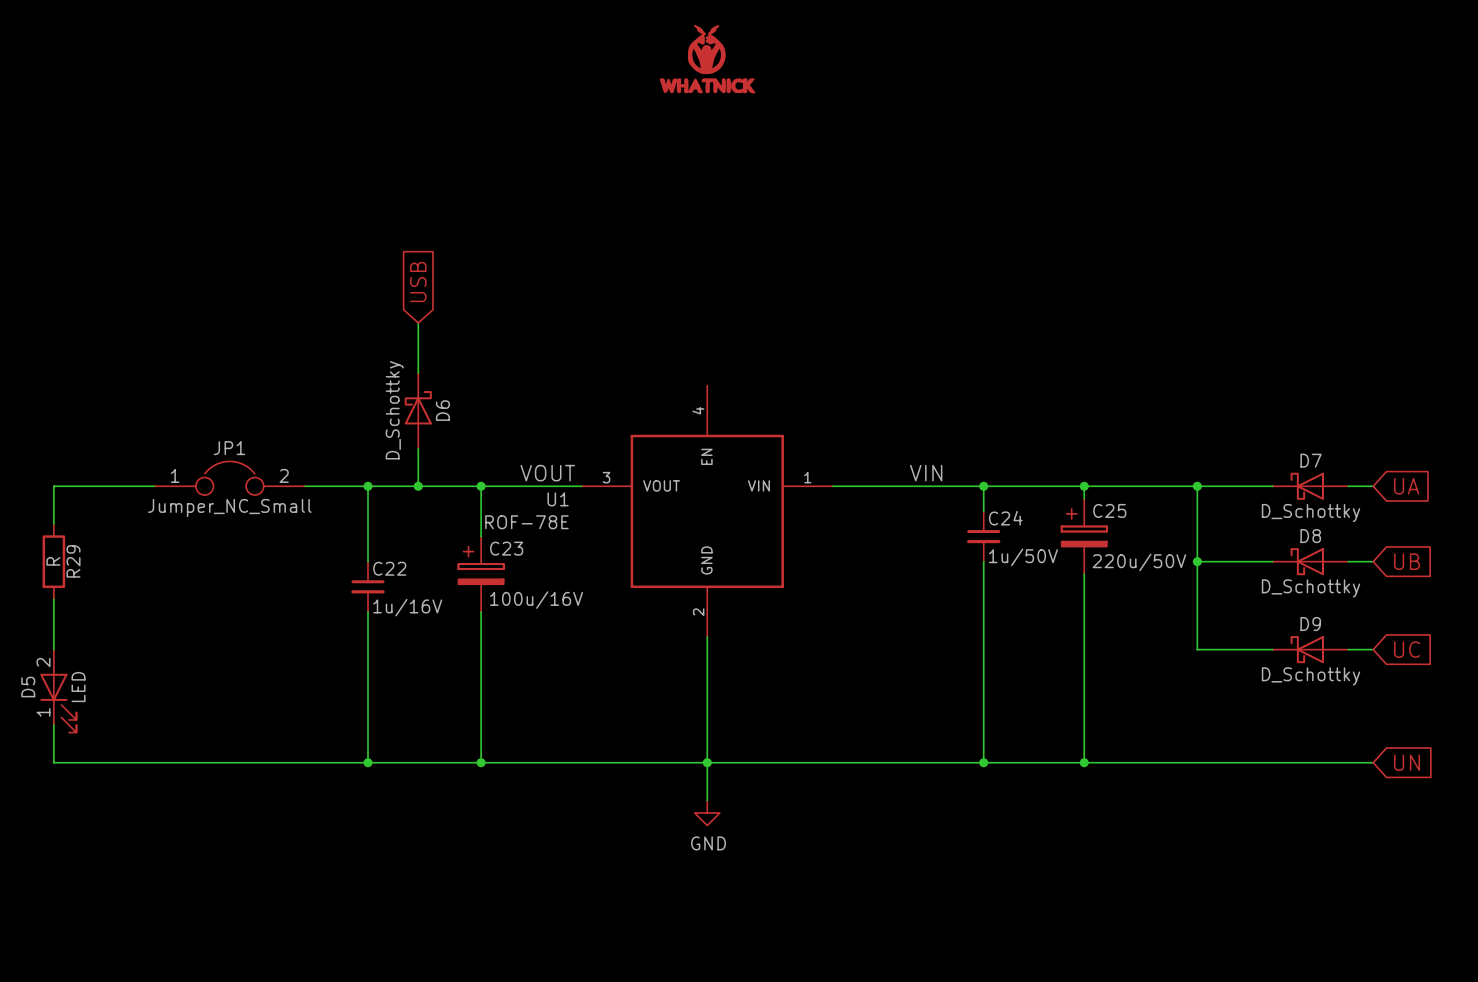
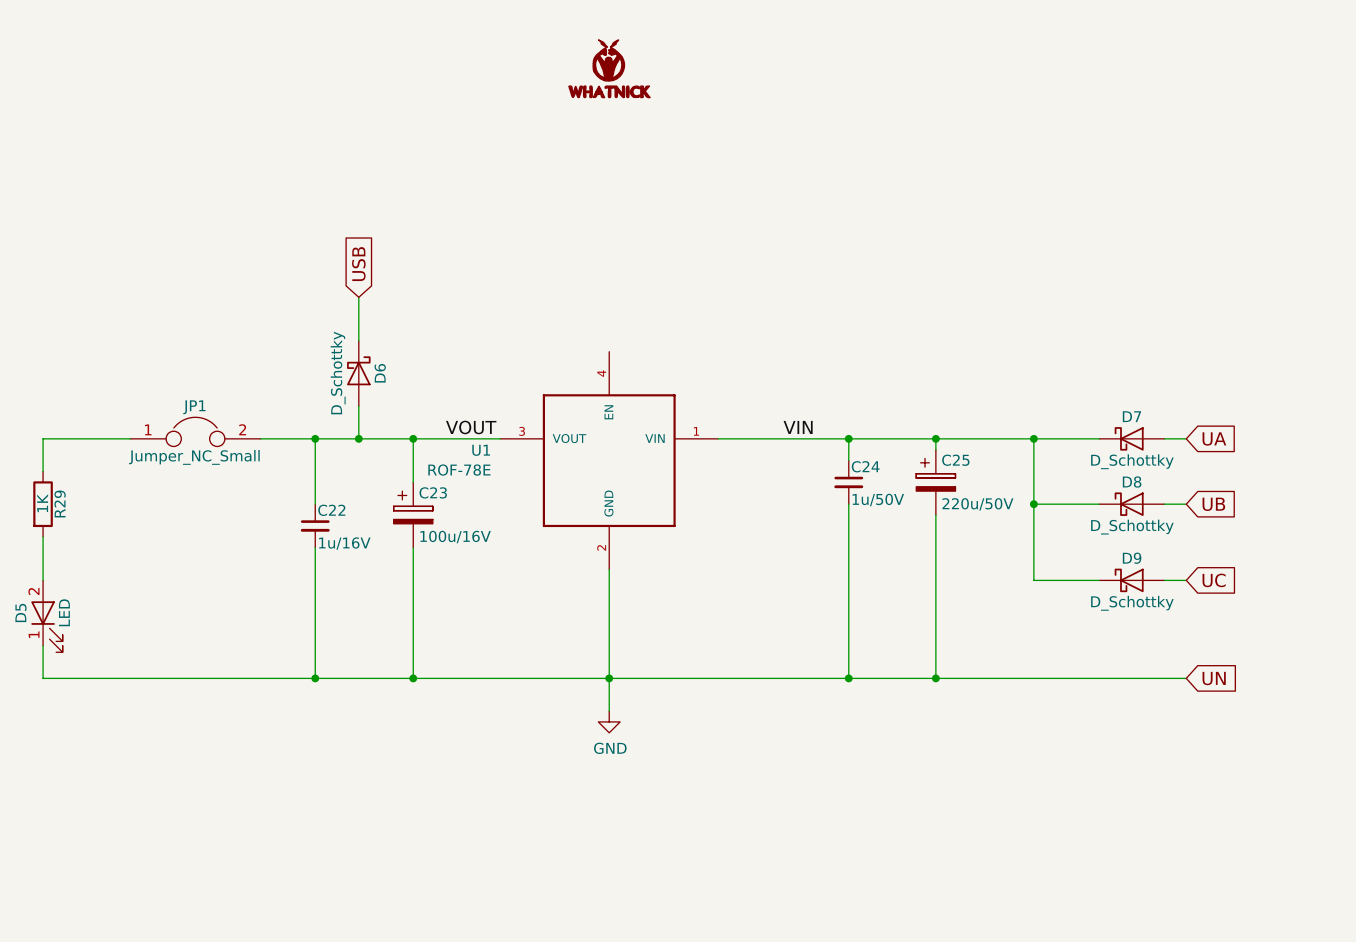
R29 value: R (53, 561) -> 1K (42, 503)

